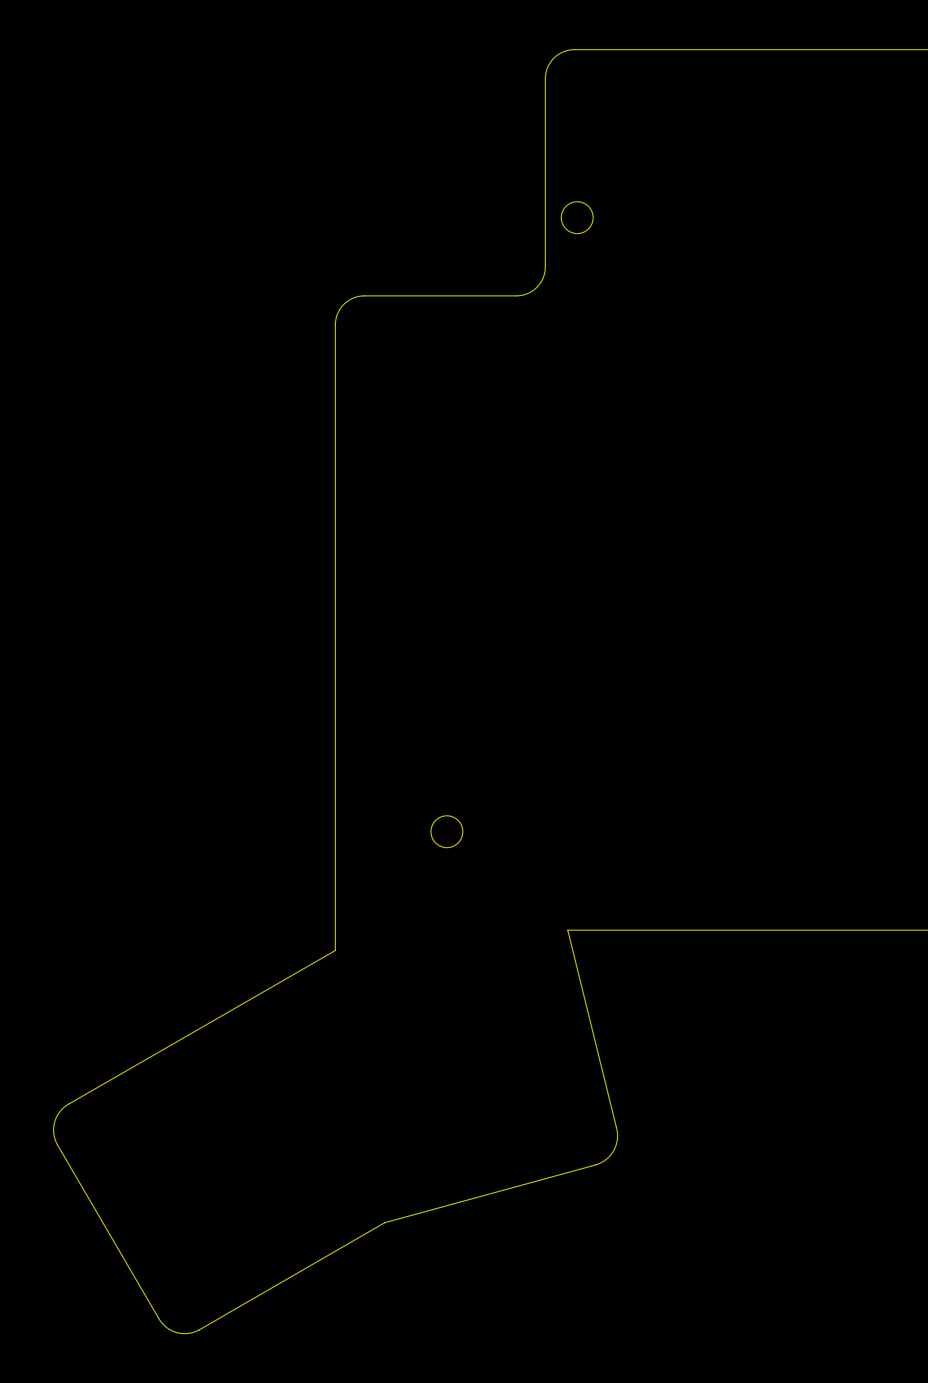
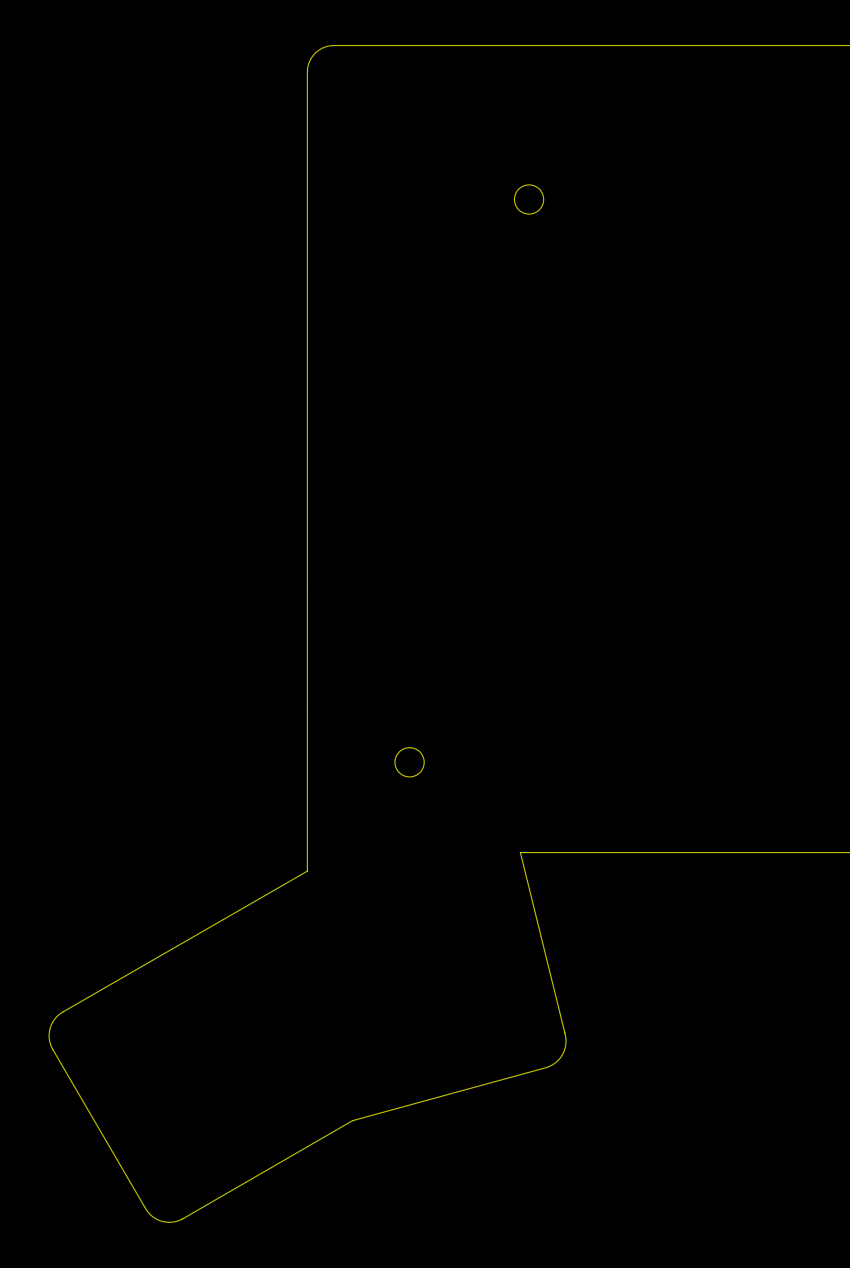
board edge: (574, 49) (564, 51) (556, 55) (548, 66) (545, 75) (545, 266) (543, 276) (539, 284) (528, 293) (519, 295) (357, 296) (348, 300) (341, 306) (337, 315) (335, 324) -> (526, 45) (333, 45) (322, 48) (313, 55) (307, 72) (307, 297)

